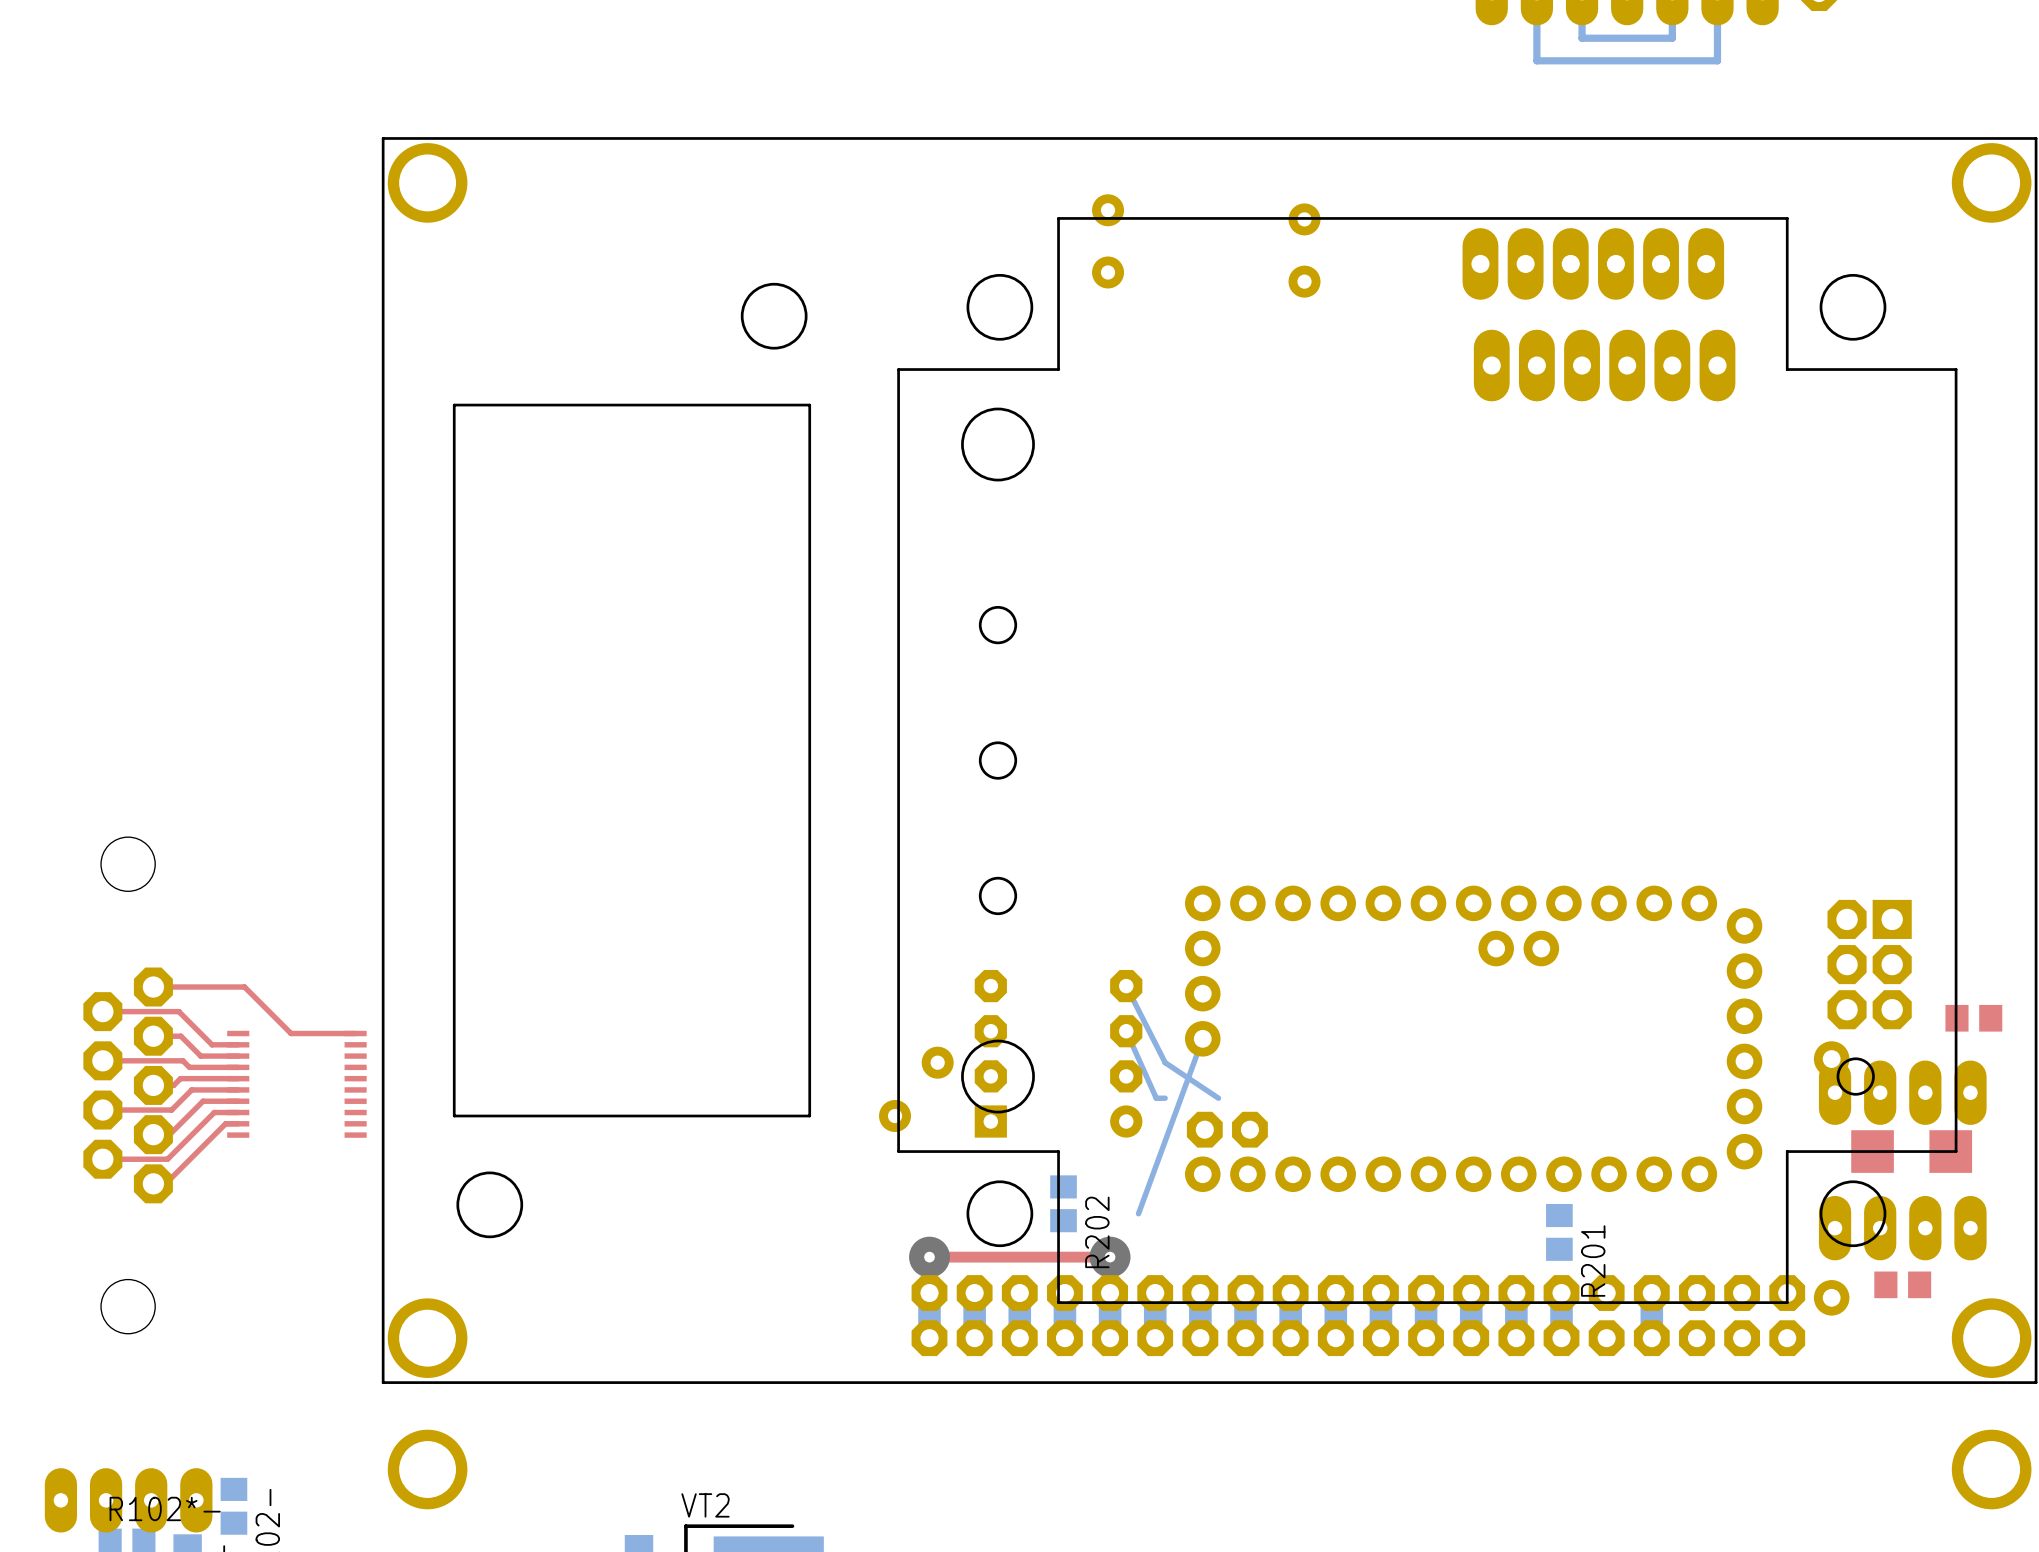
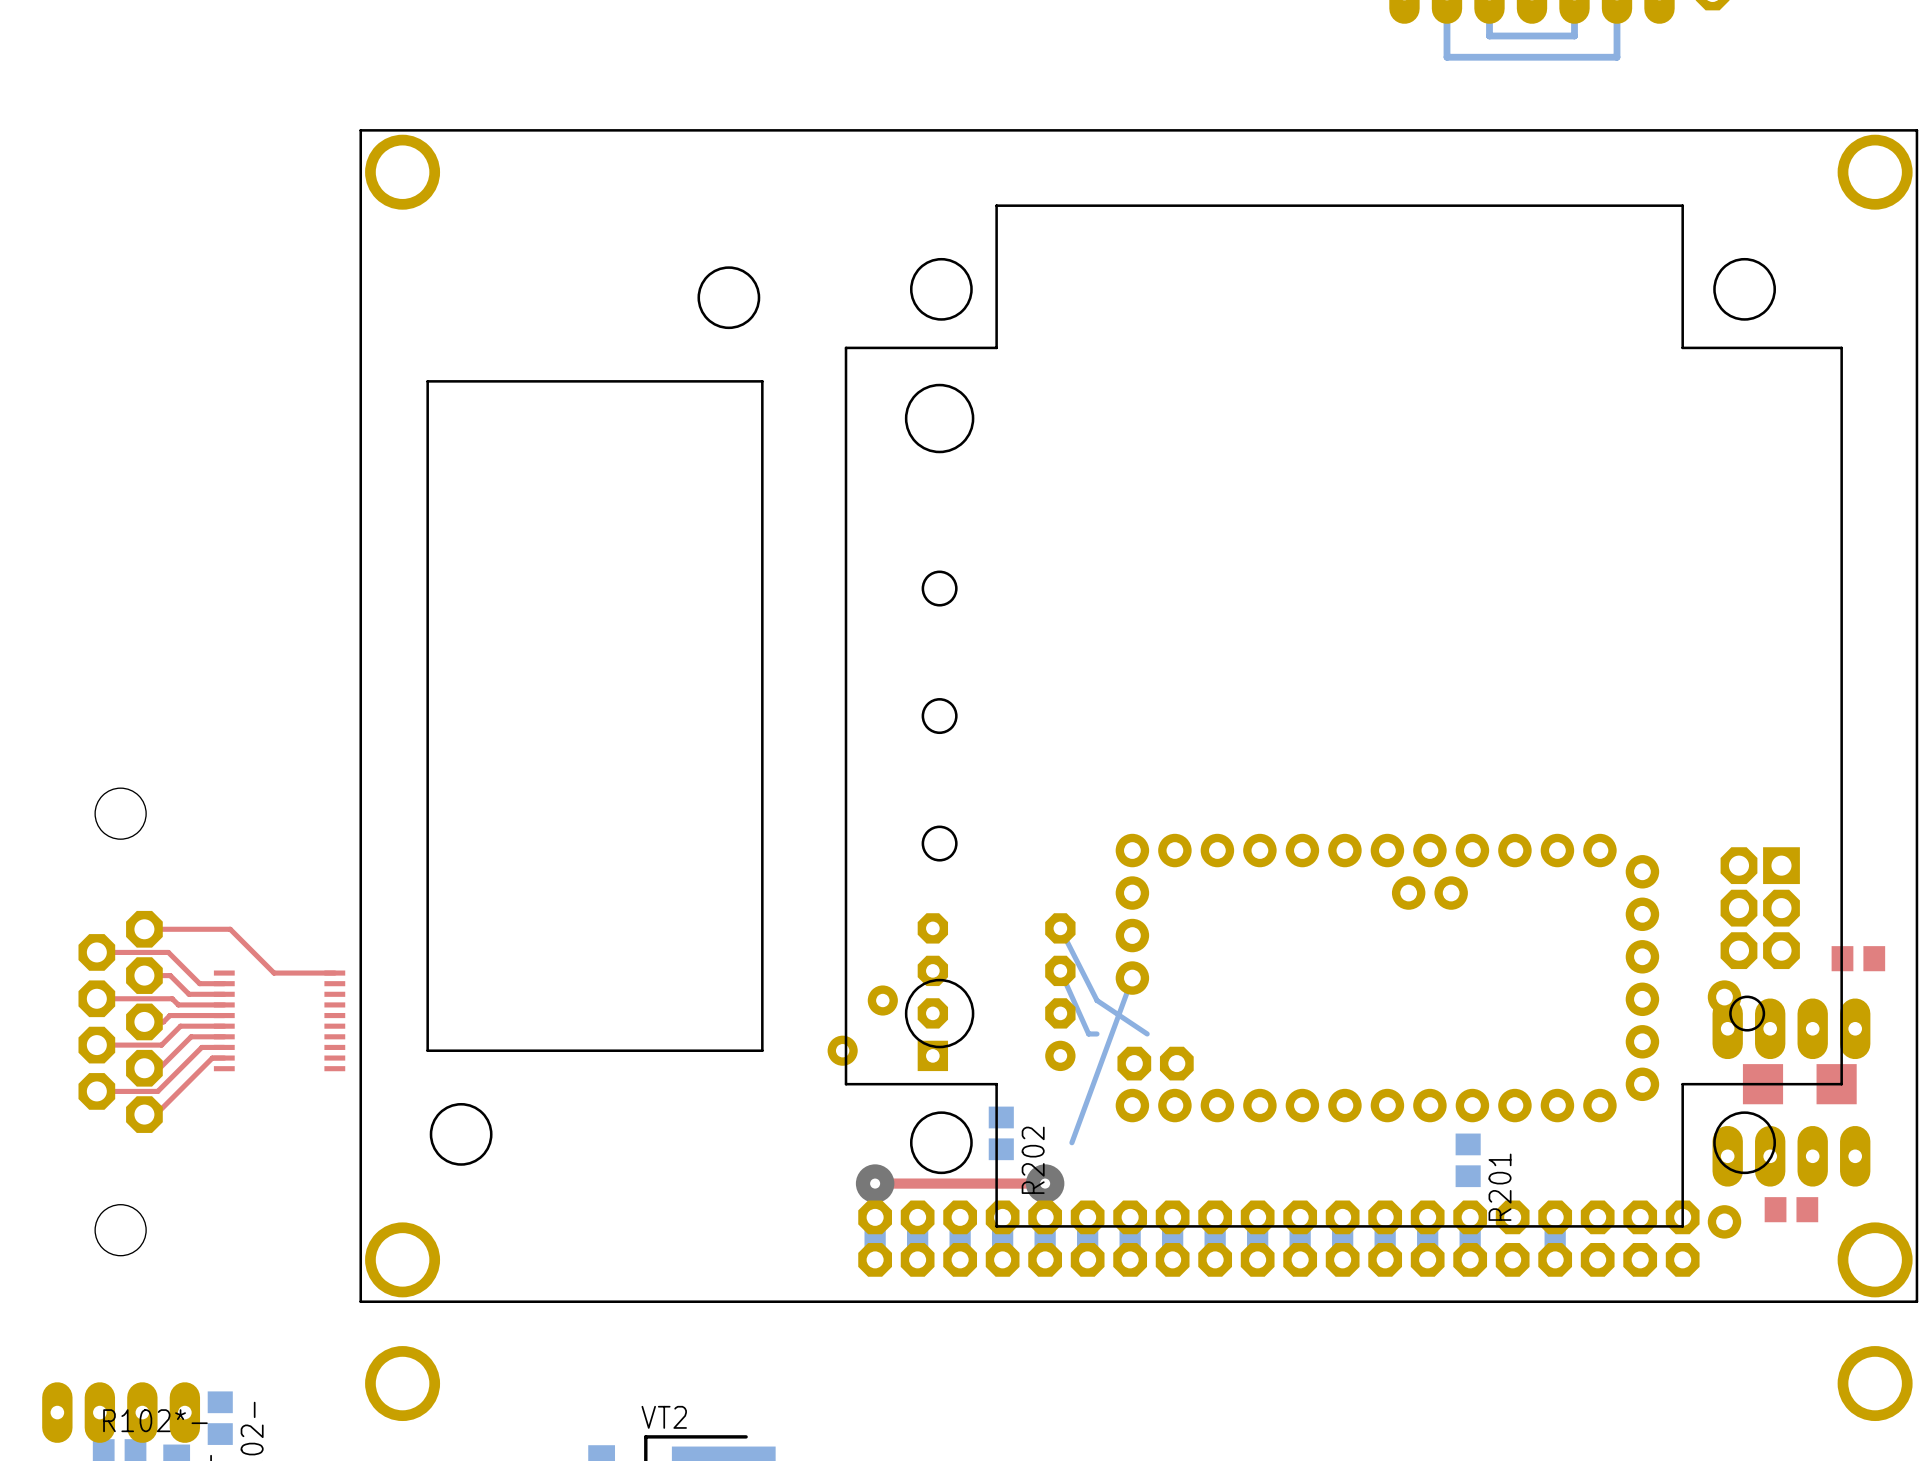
part: (1108, 241) -> none
part: (1304, 250) -> none
part: (1593, 263) -> none
part: (1604, 365) -> none

